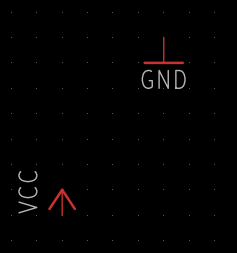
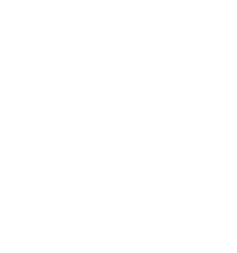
power symbol: GND (163, 50) -> none
power symbol: VCC (62, 201) -> none

